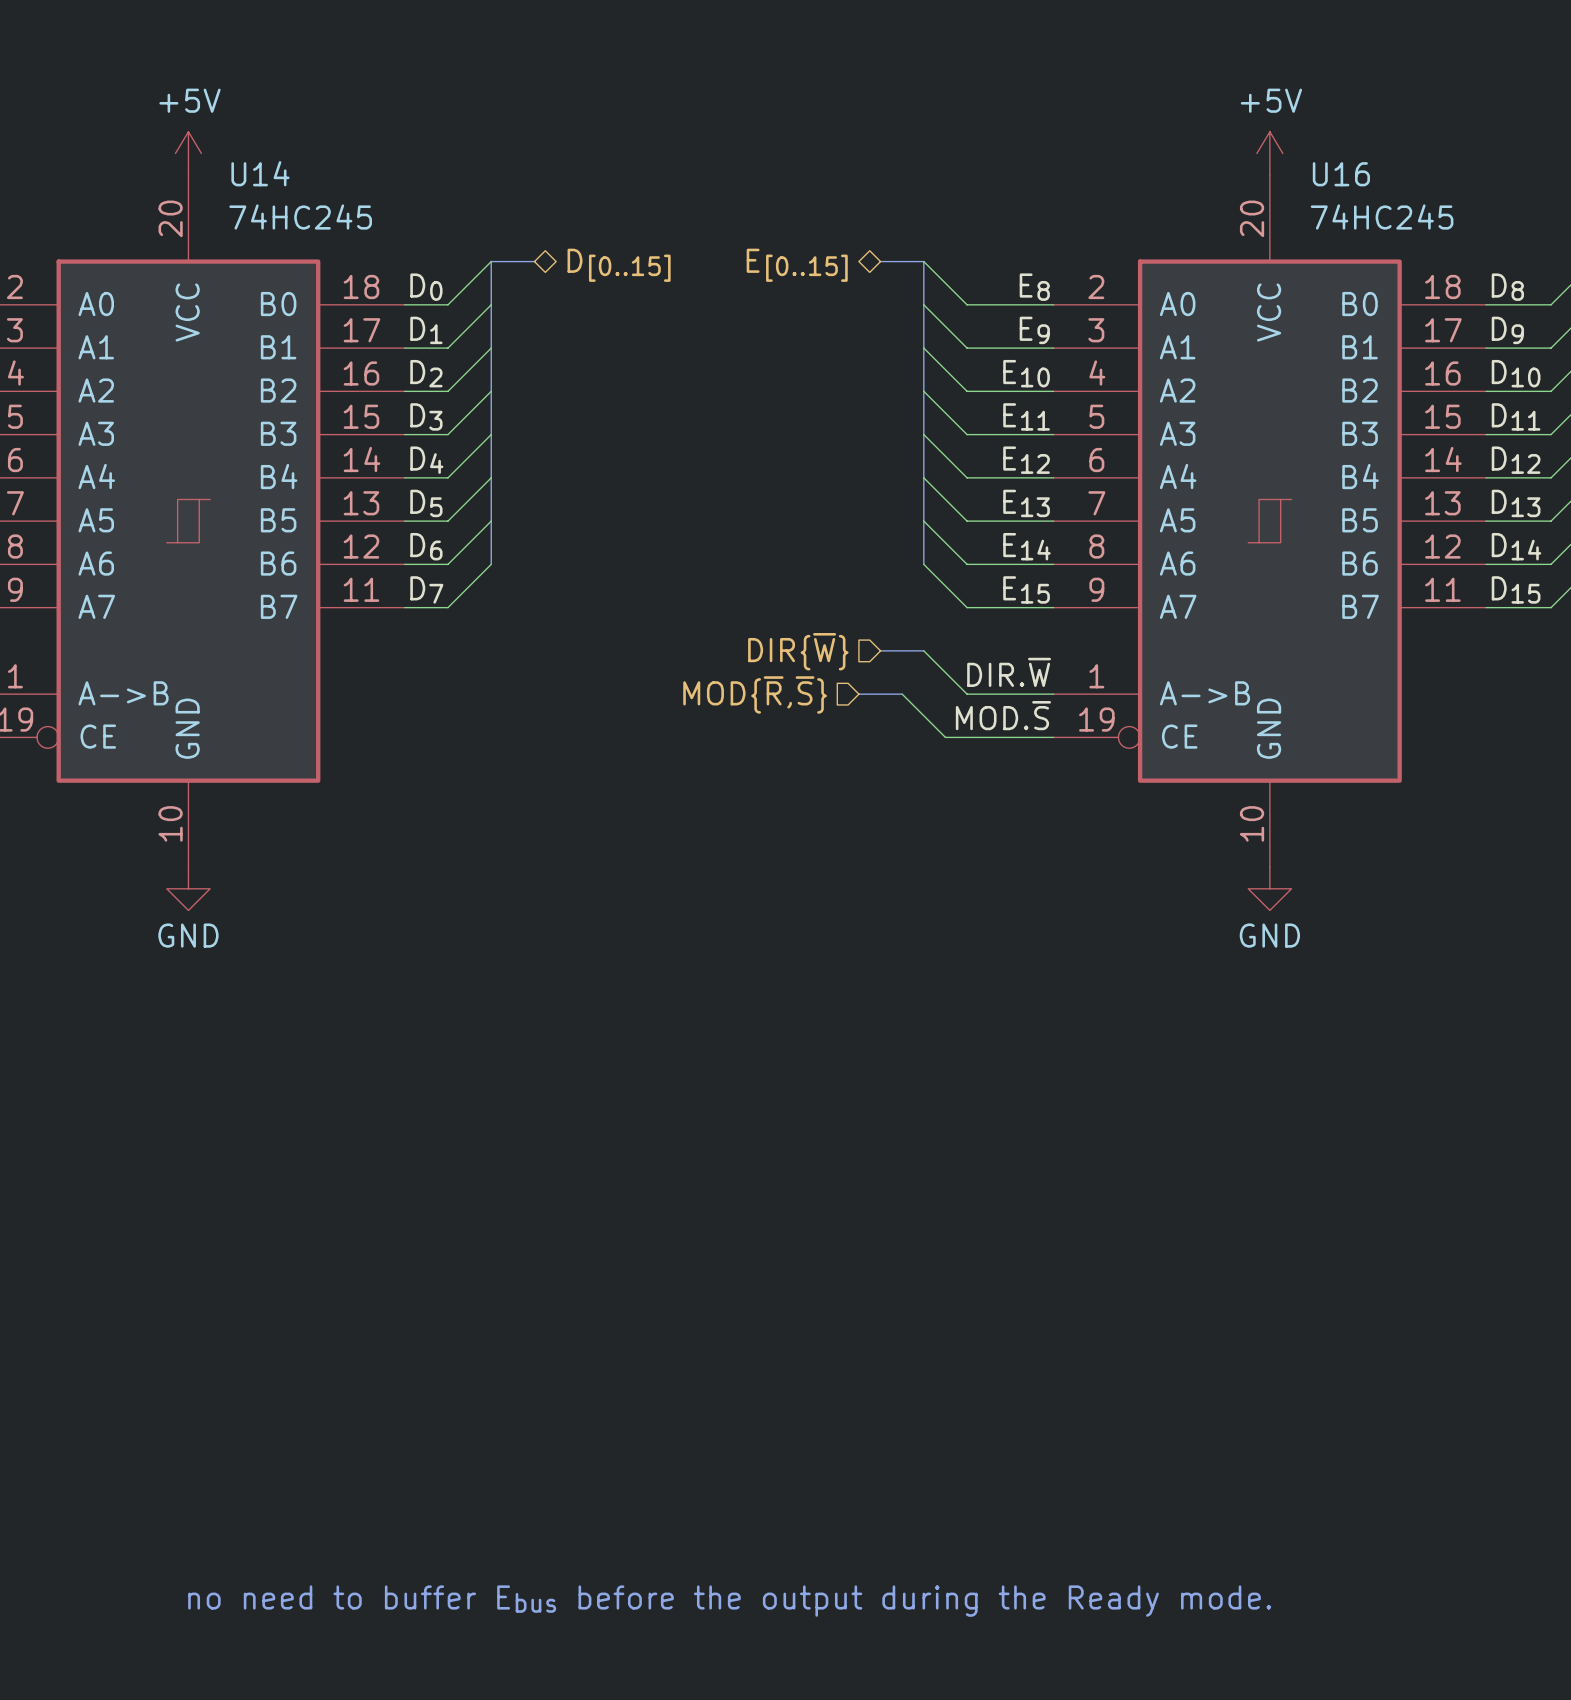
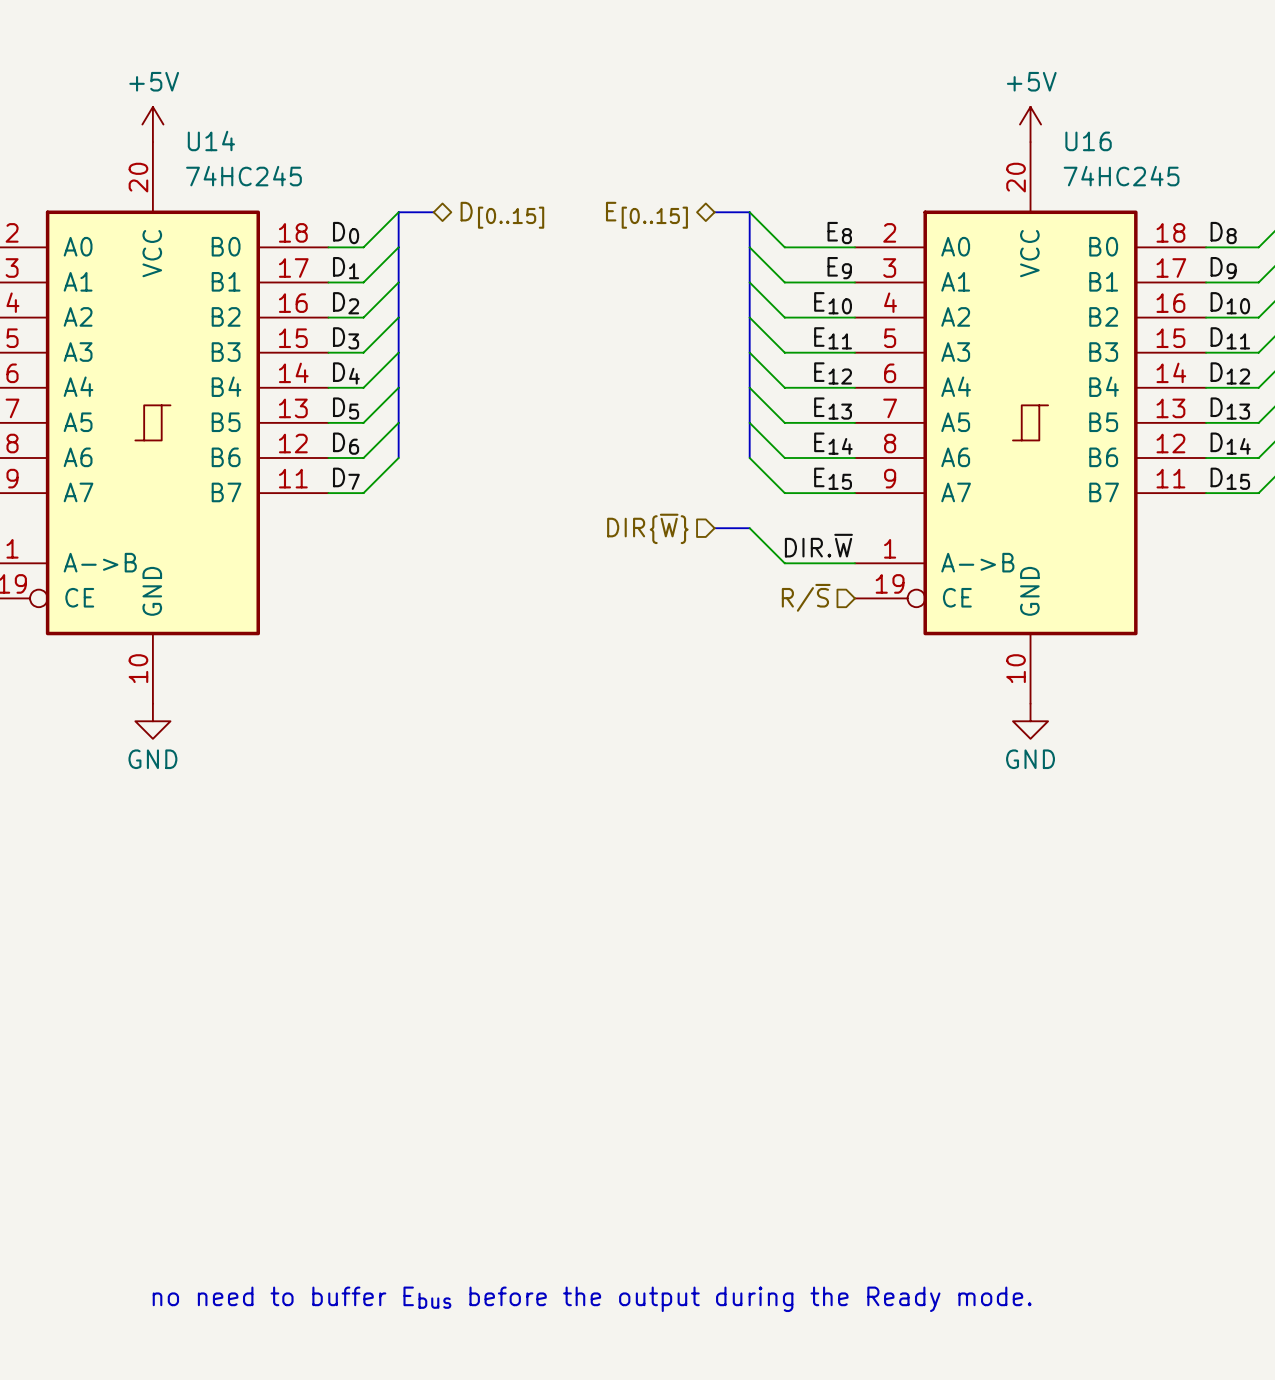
hierarchical label: MOD{~{R},~{S}} (755, 694) -> none
bus: (858, 694) (902, 694) -> none
wire: (902, 694) (945, 737) (1053, 737) -> none
label: MOD.~{S} (1003, 715) -> none
hierarchical label: none -> R/~{S} (806, 597)

